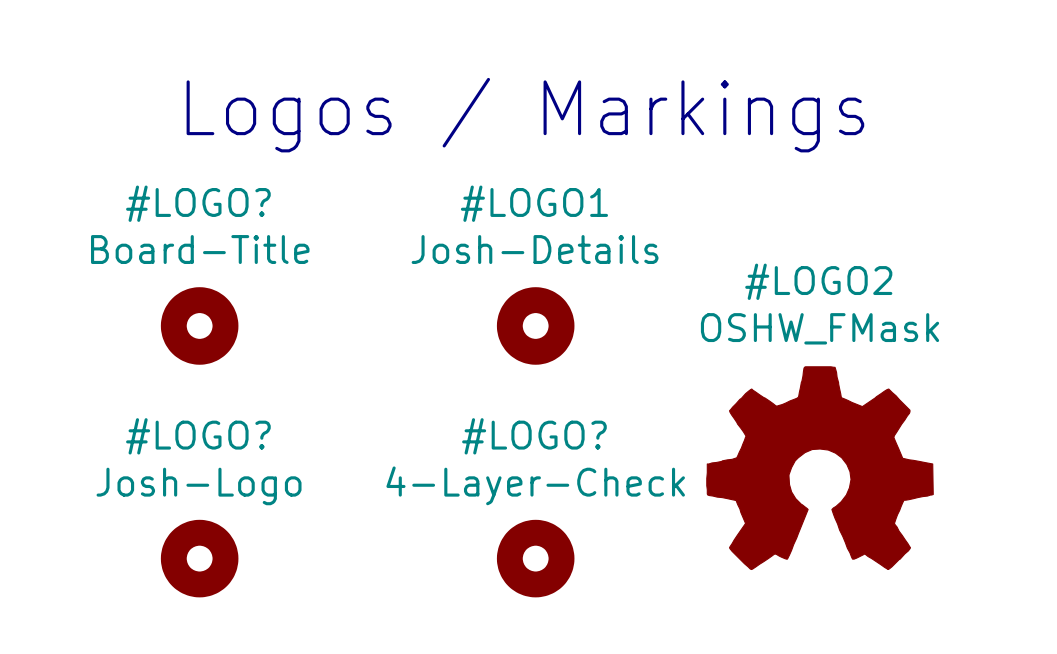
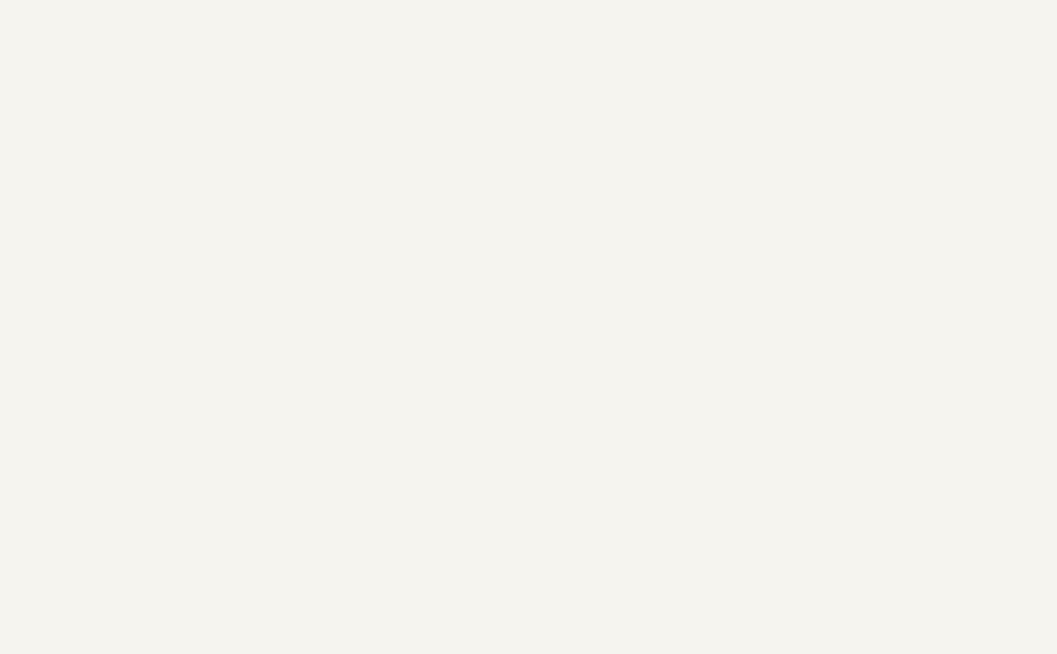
text: Logos / Markings (525, 115) -> none
#LOGO?: Board-Title (199, 325) -> none
#LOGO1: Josh-Details (535, 325) -> none
#LOGO2: OSHW_FMask (820, 468) -> none
#LOGO?: Josh-Logo (199, 558) -> none
#LOGO?: 4-Layer-Check (535, 558) -> none

